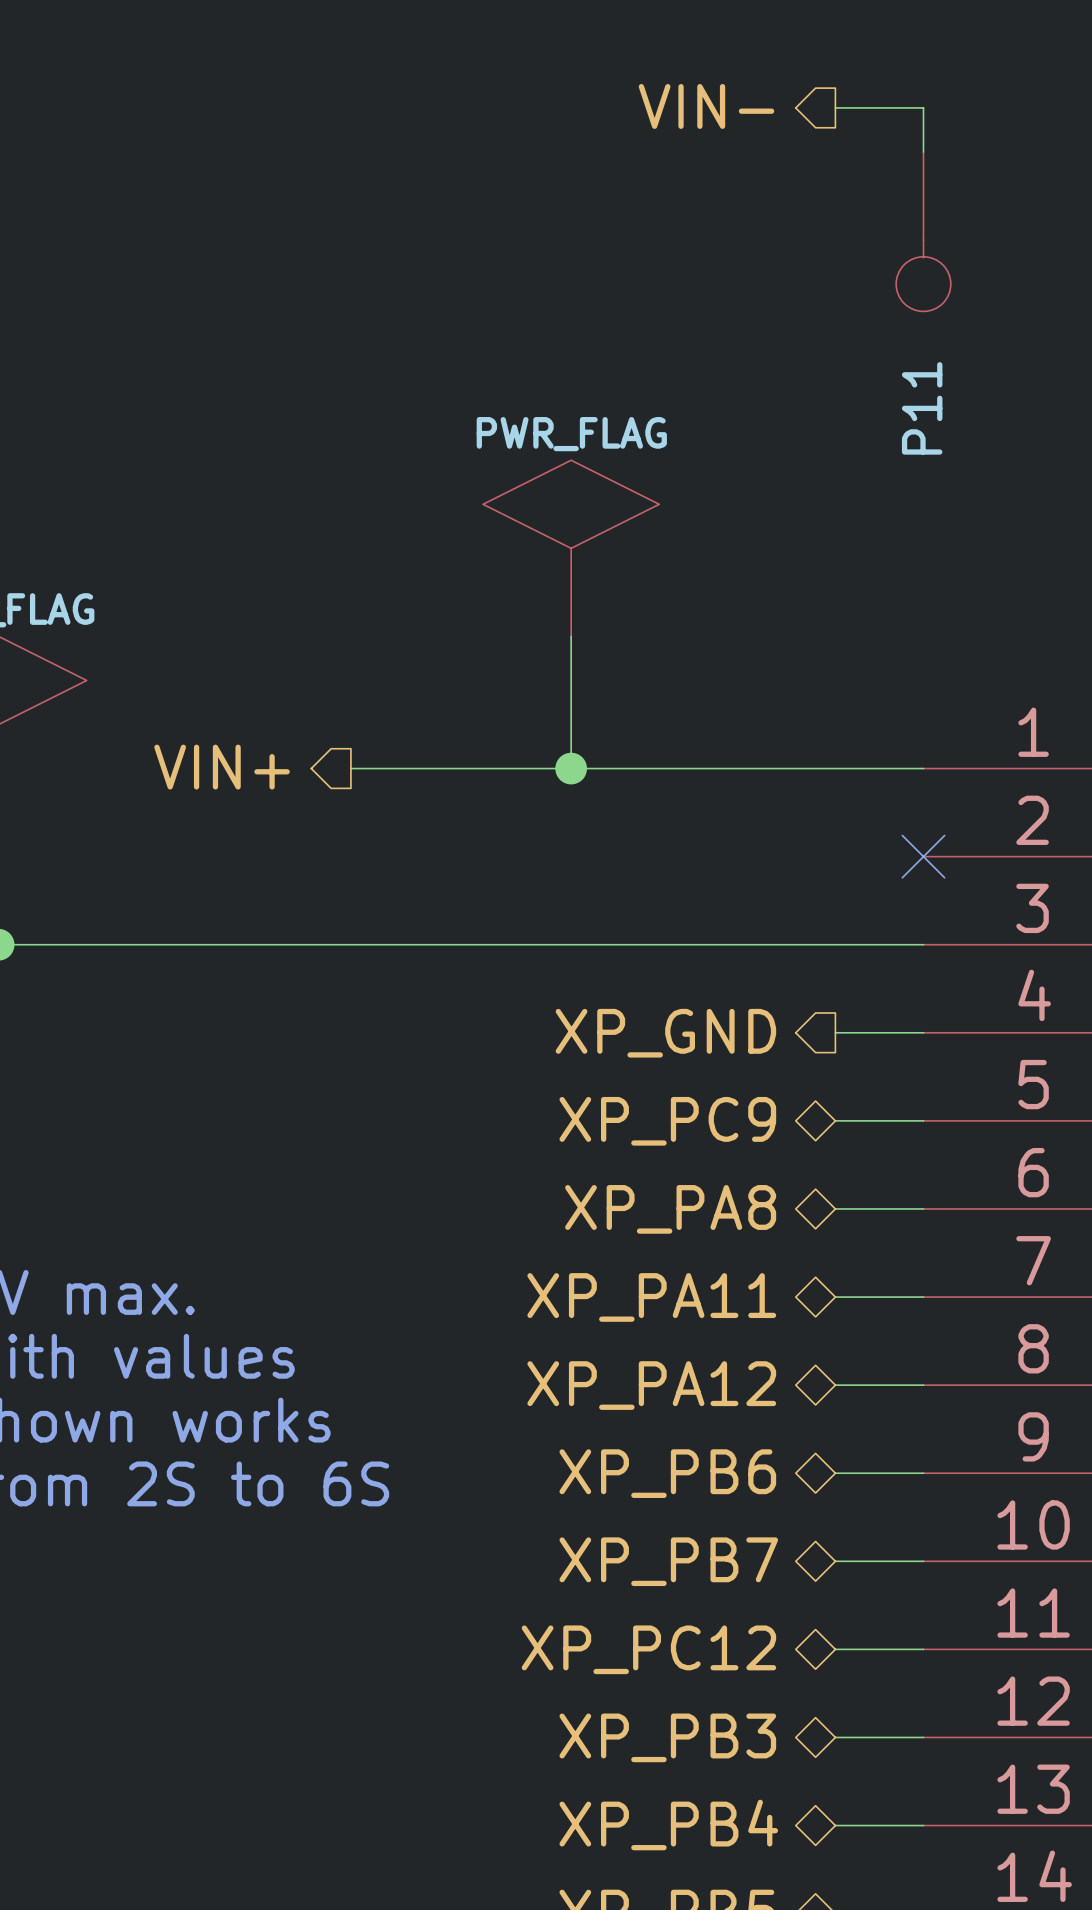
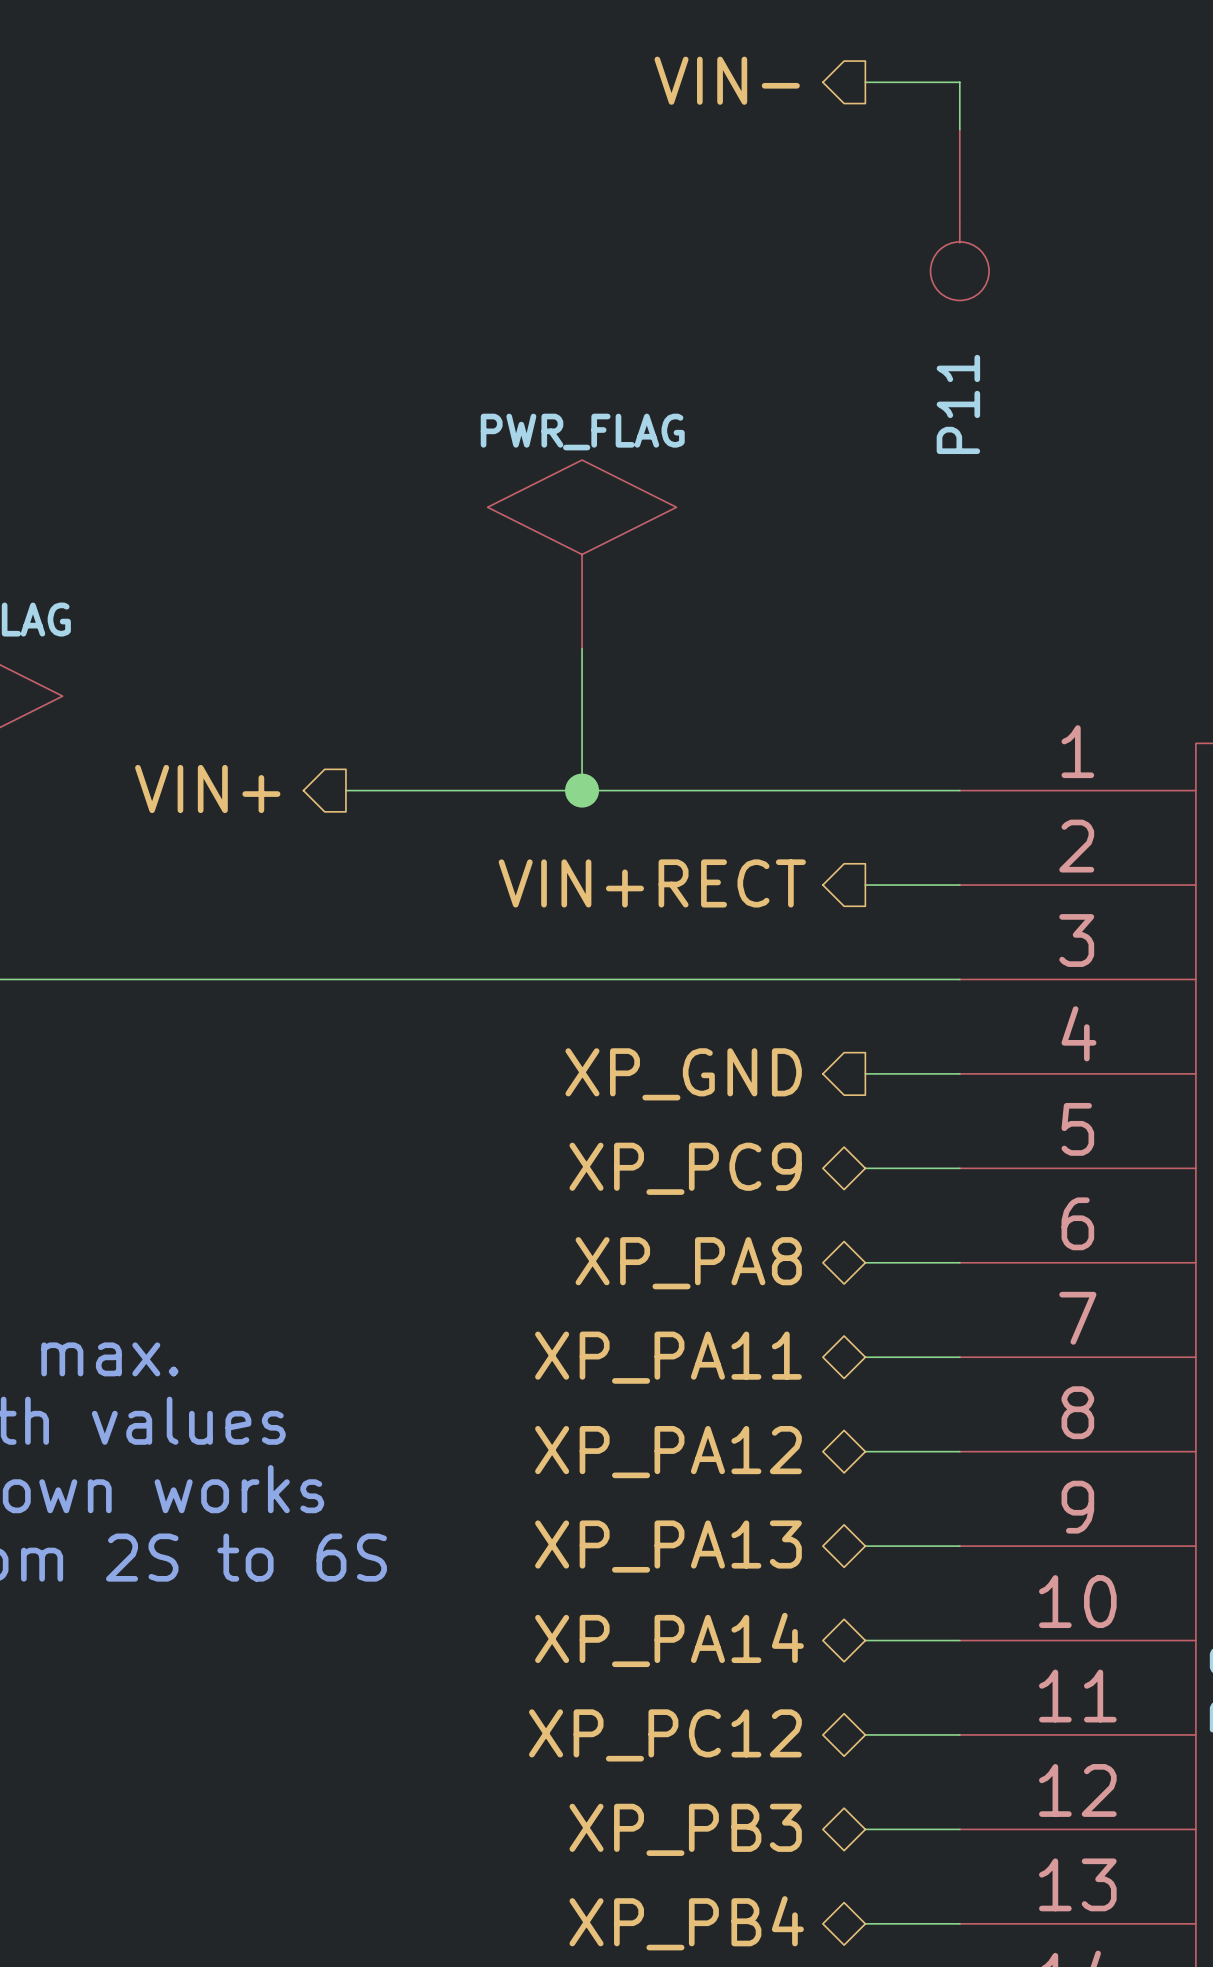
hierarchical label: none -> VIN+RECT (652, 883)
wire: none -> (865, 885) (959, 885)
no-connect mark: (923, 856) -> none
hierarchical label: XP_PB6 (667, 1473) -> XP_PA13 (668, 1546)
hierarchical label: XP_PB7 (668, 1561) -> XP_PA14 (669, 1639)

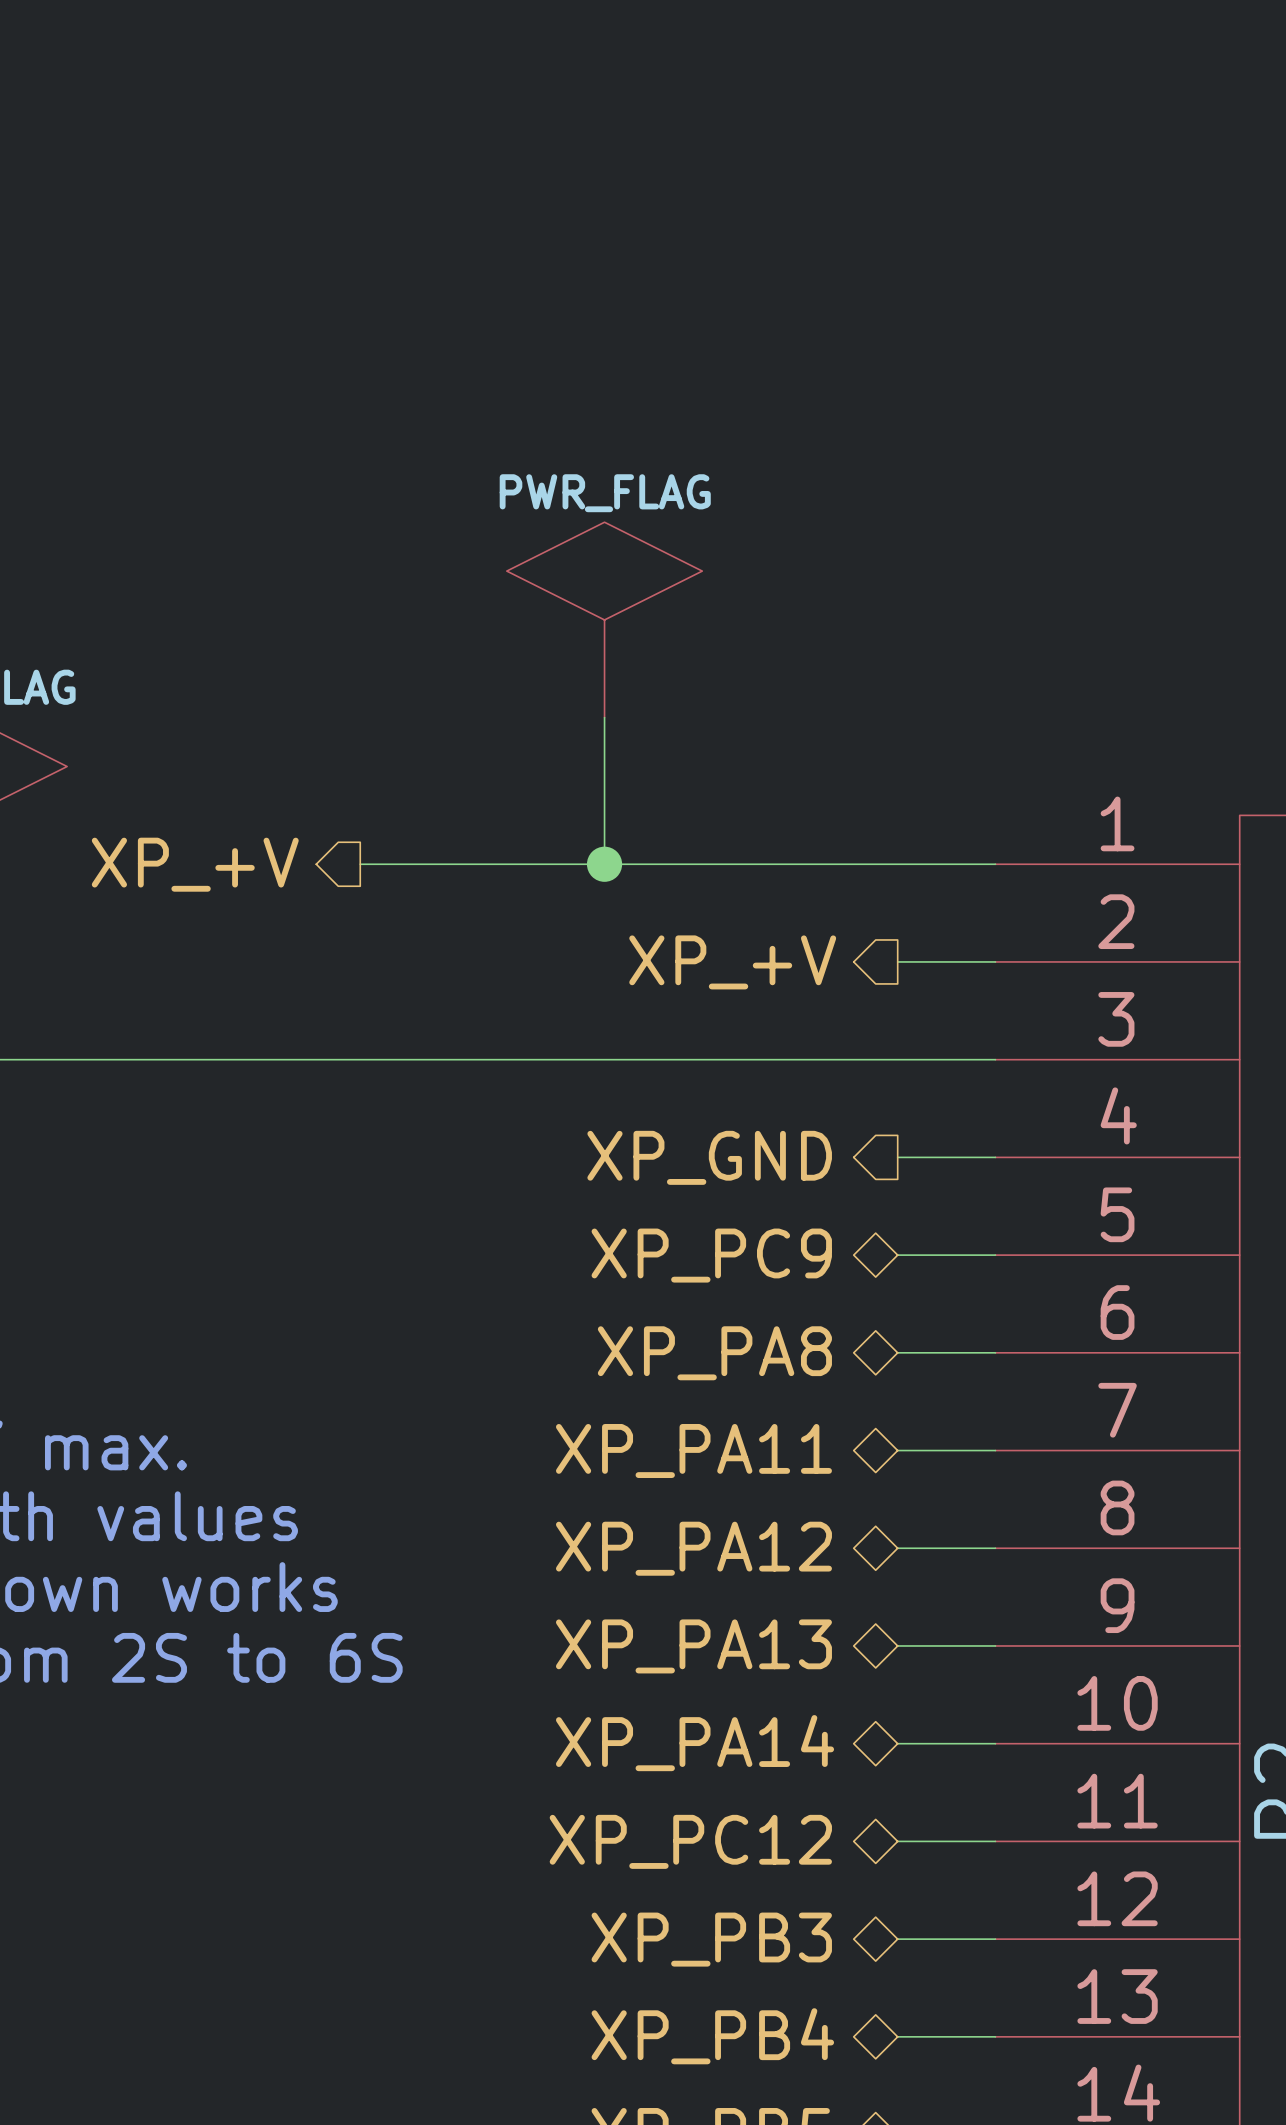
hierarchical label: VIN- (727, 80) -> none
wire: (865, 82) (959, 82) (959, 129) -> none
P11: (959, 214) -> none
hierarchical label: VIN+ (207, 789) -> XP_+V (195, 864)
hierarchical label: VIN+RECT (652, 883) -> XP_+V (732, 962)

